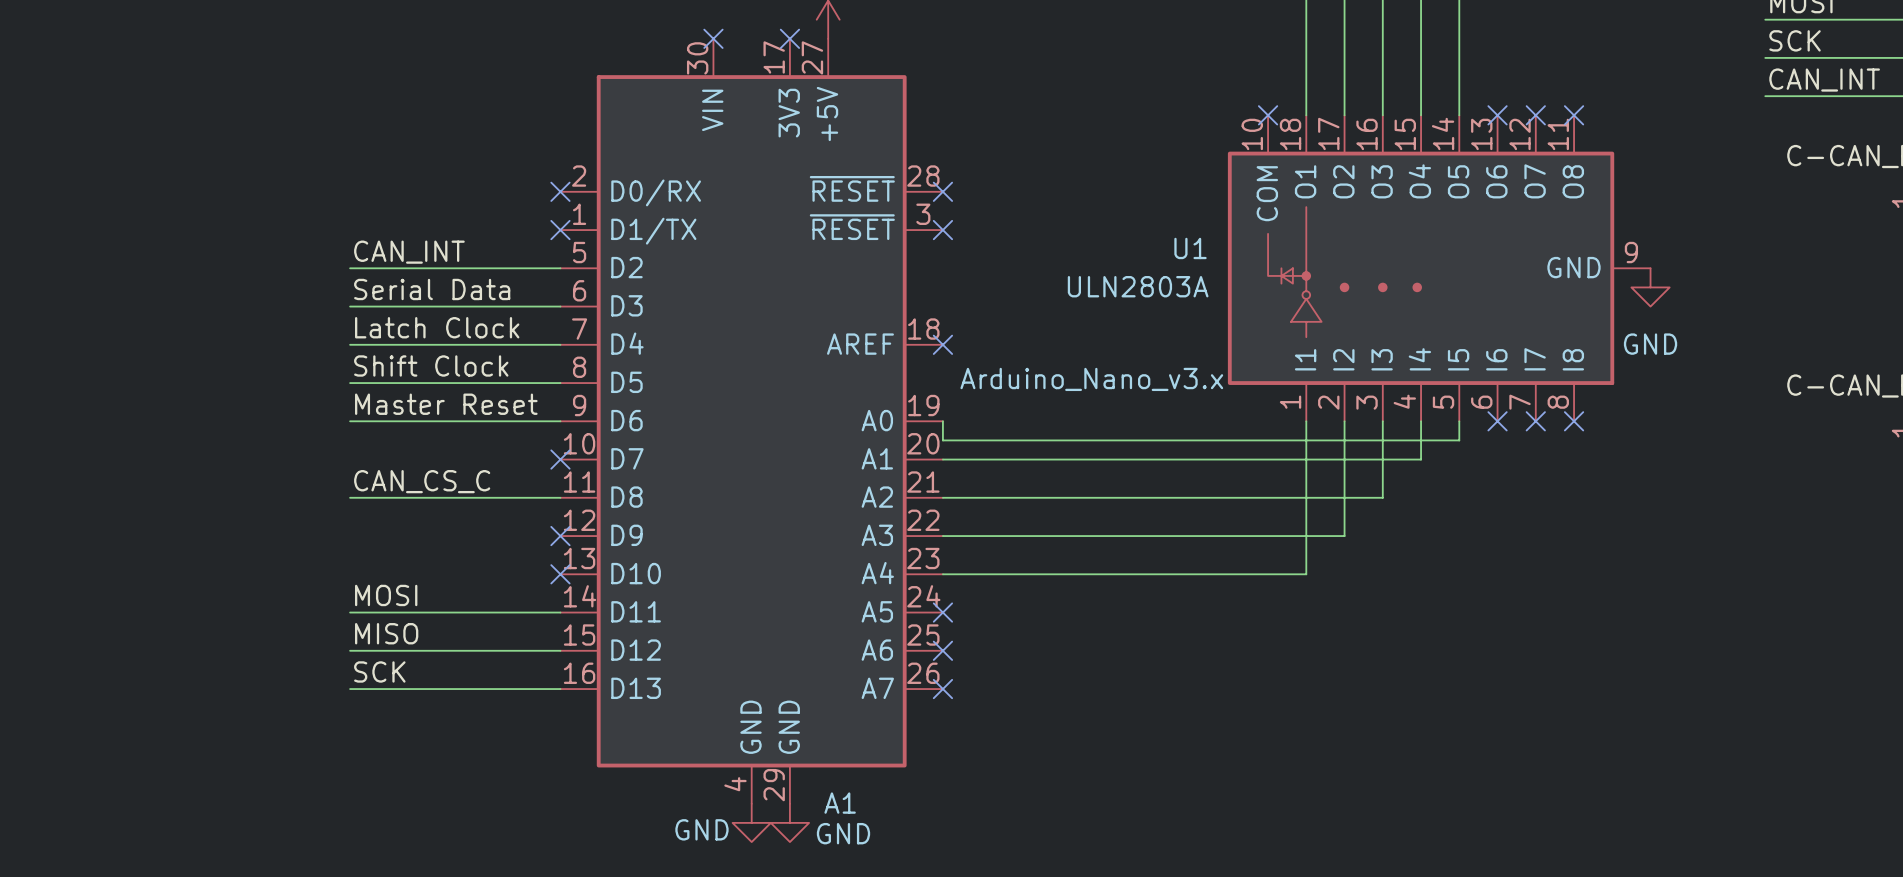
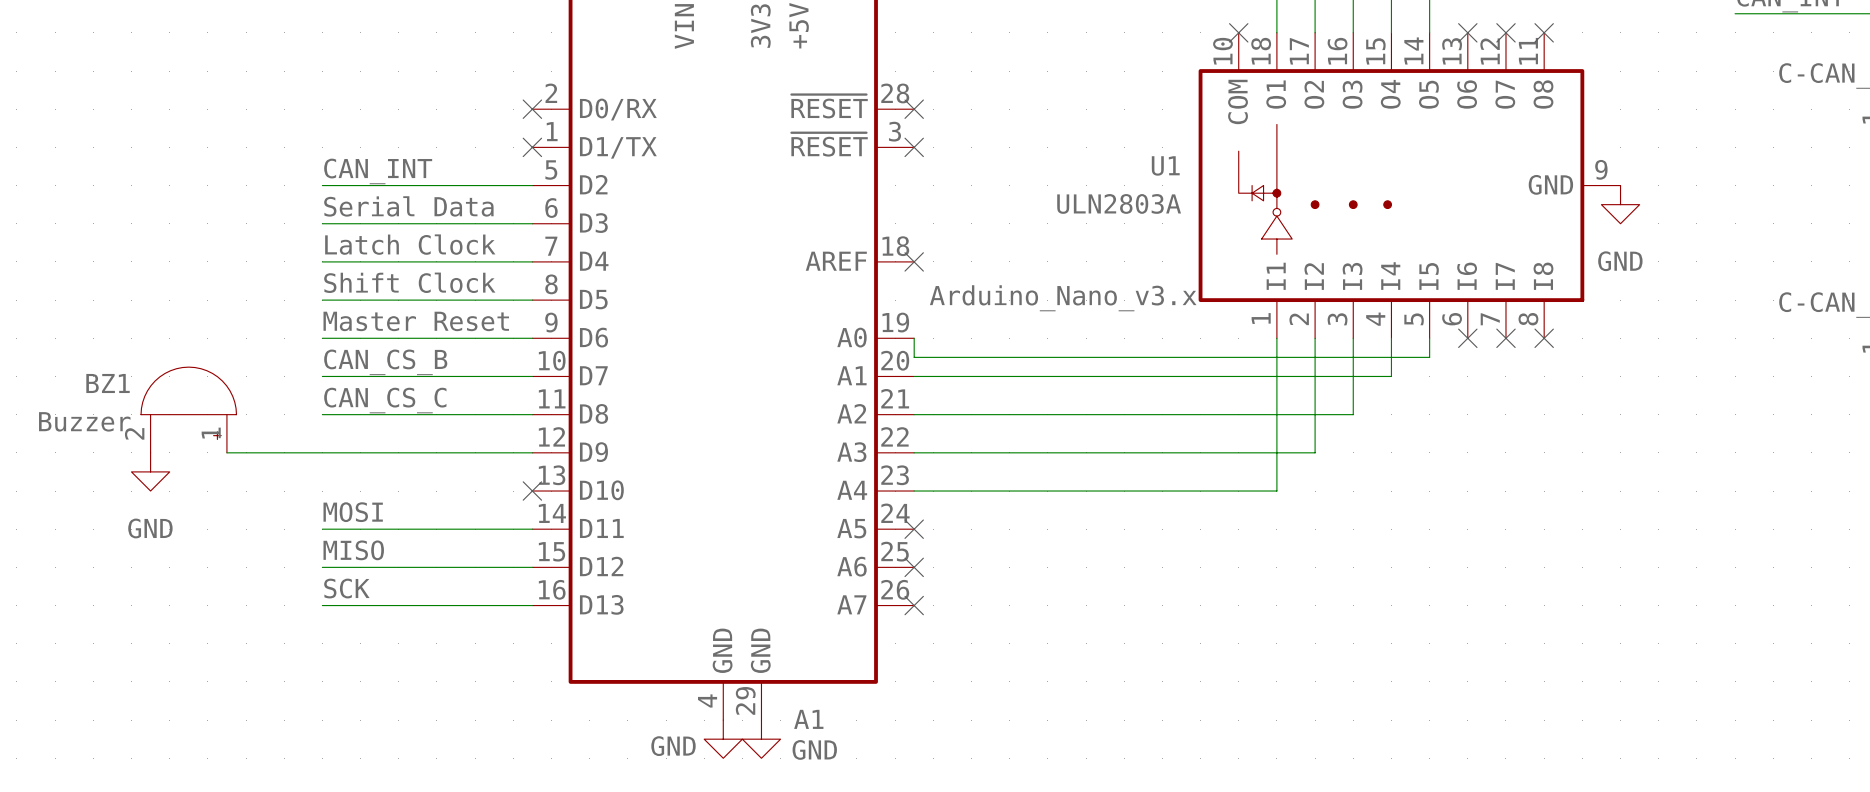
label: none -> CAN_CS_B (385, 362)
wire: none -> (322, 376) (532, 376)
no-connect mark: (560, 459) -> none
BZ1: none -> Buzzer (188, 409)
wire: none -> (226, 452) (532, 452)
no-connect mark: (560, 536) -> none
power symbol: none -> GND (150, 471)

